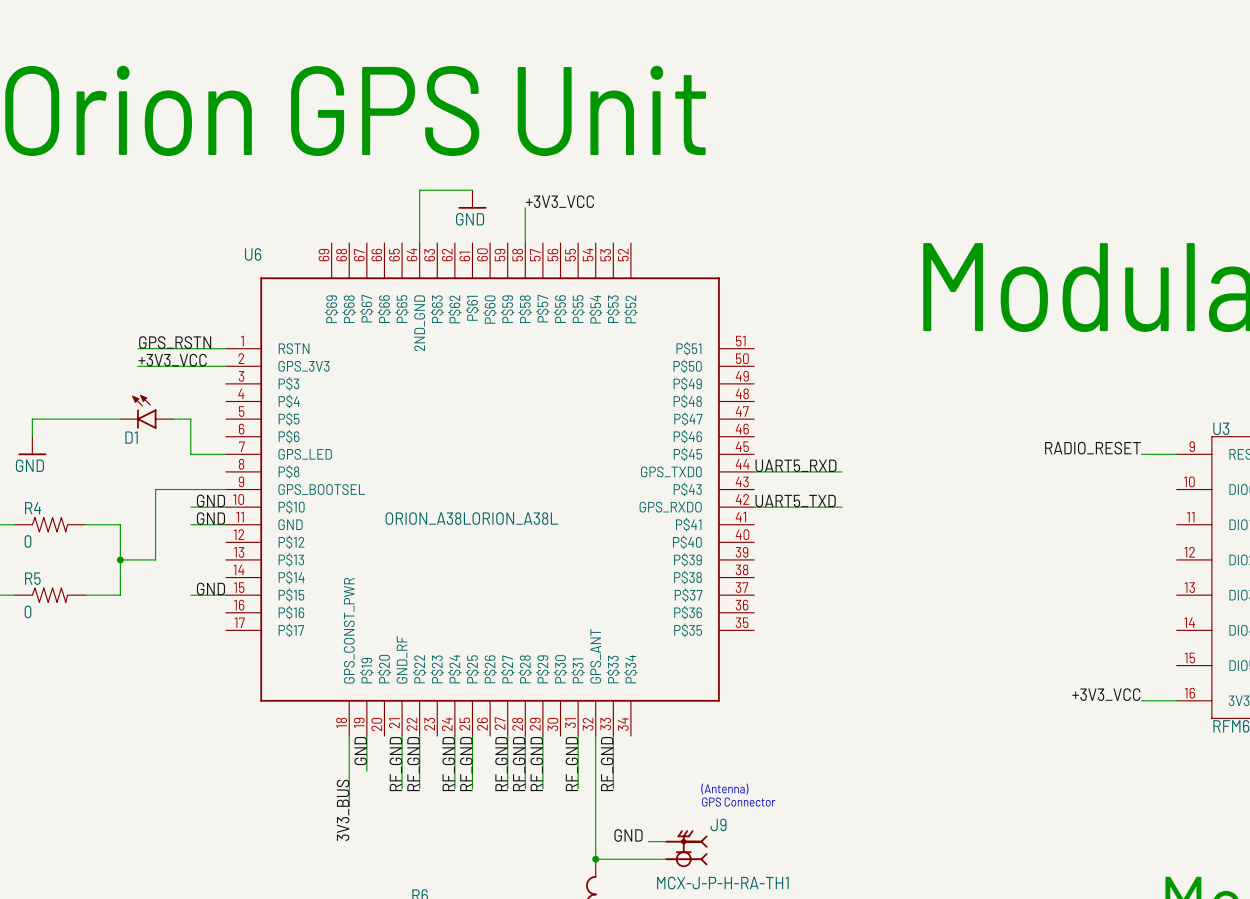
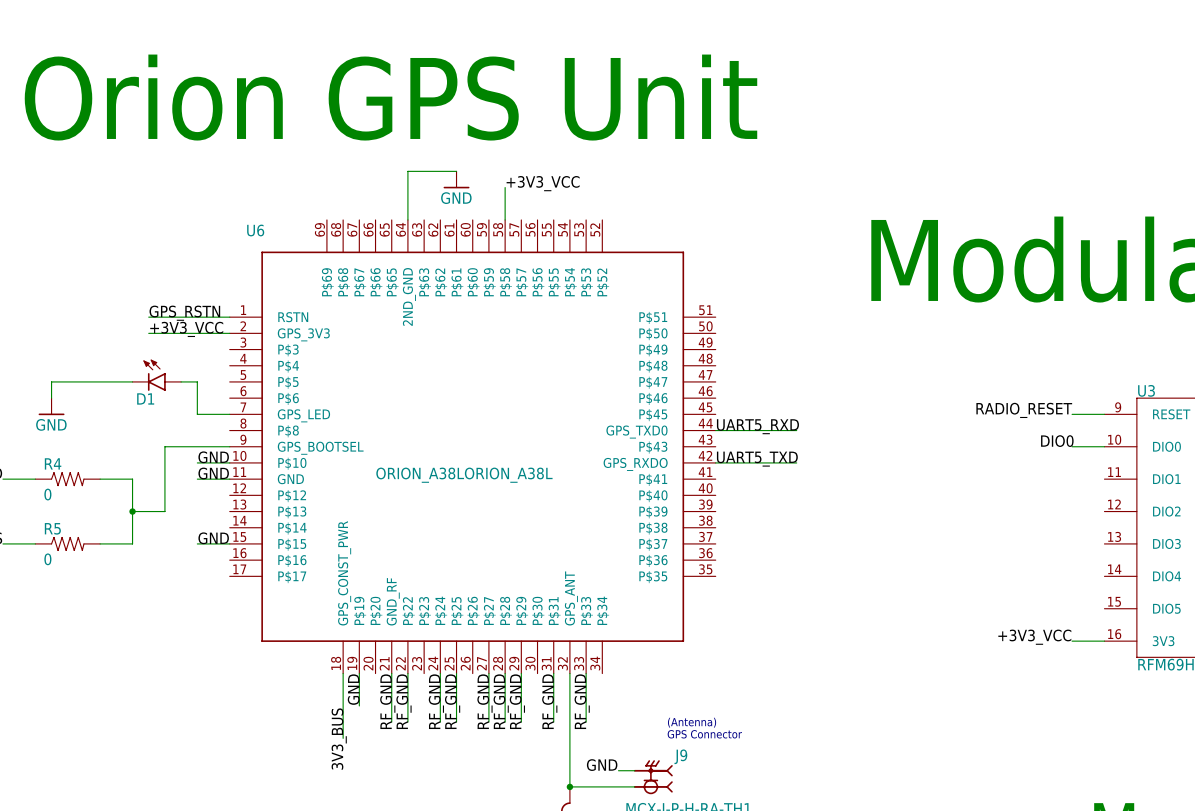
label: none -> DIO0 (1057, 441)
wire: none -> (1072, 446) (1104, 446)

